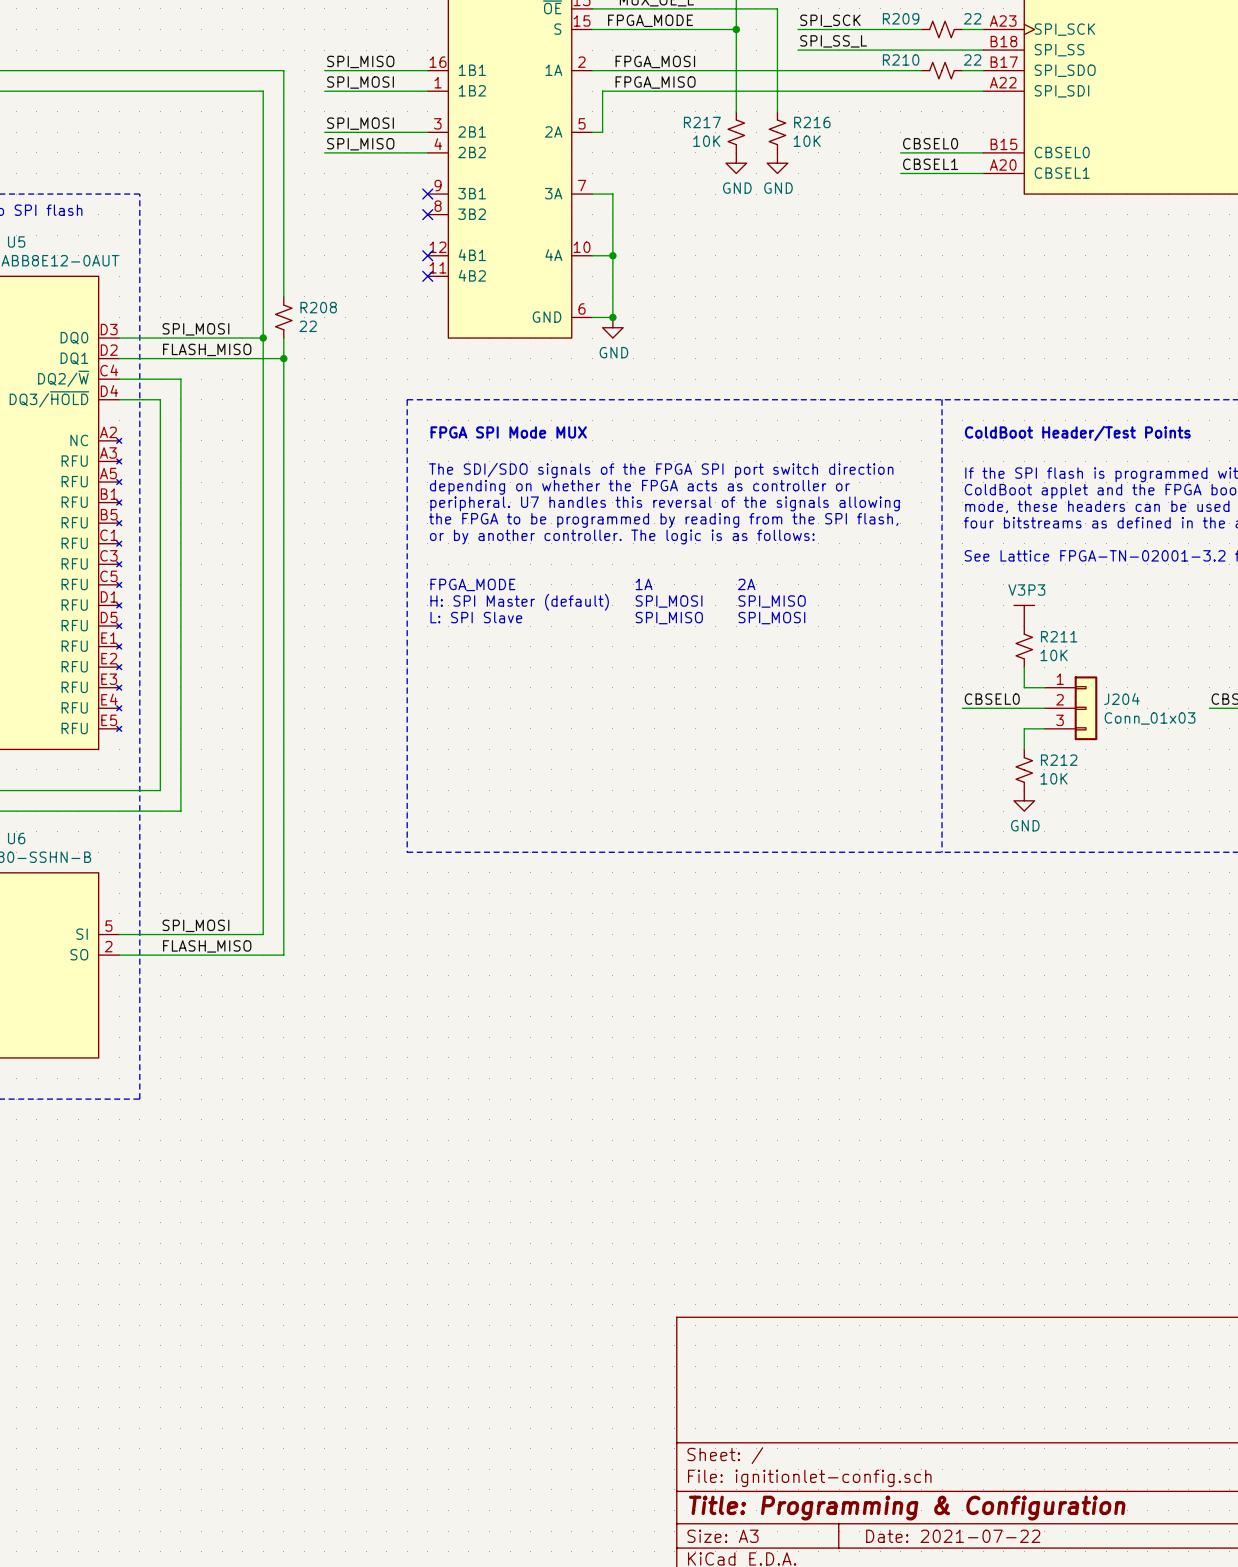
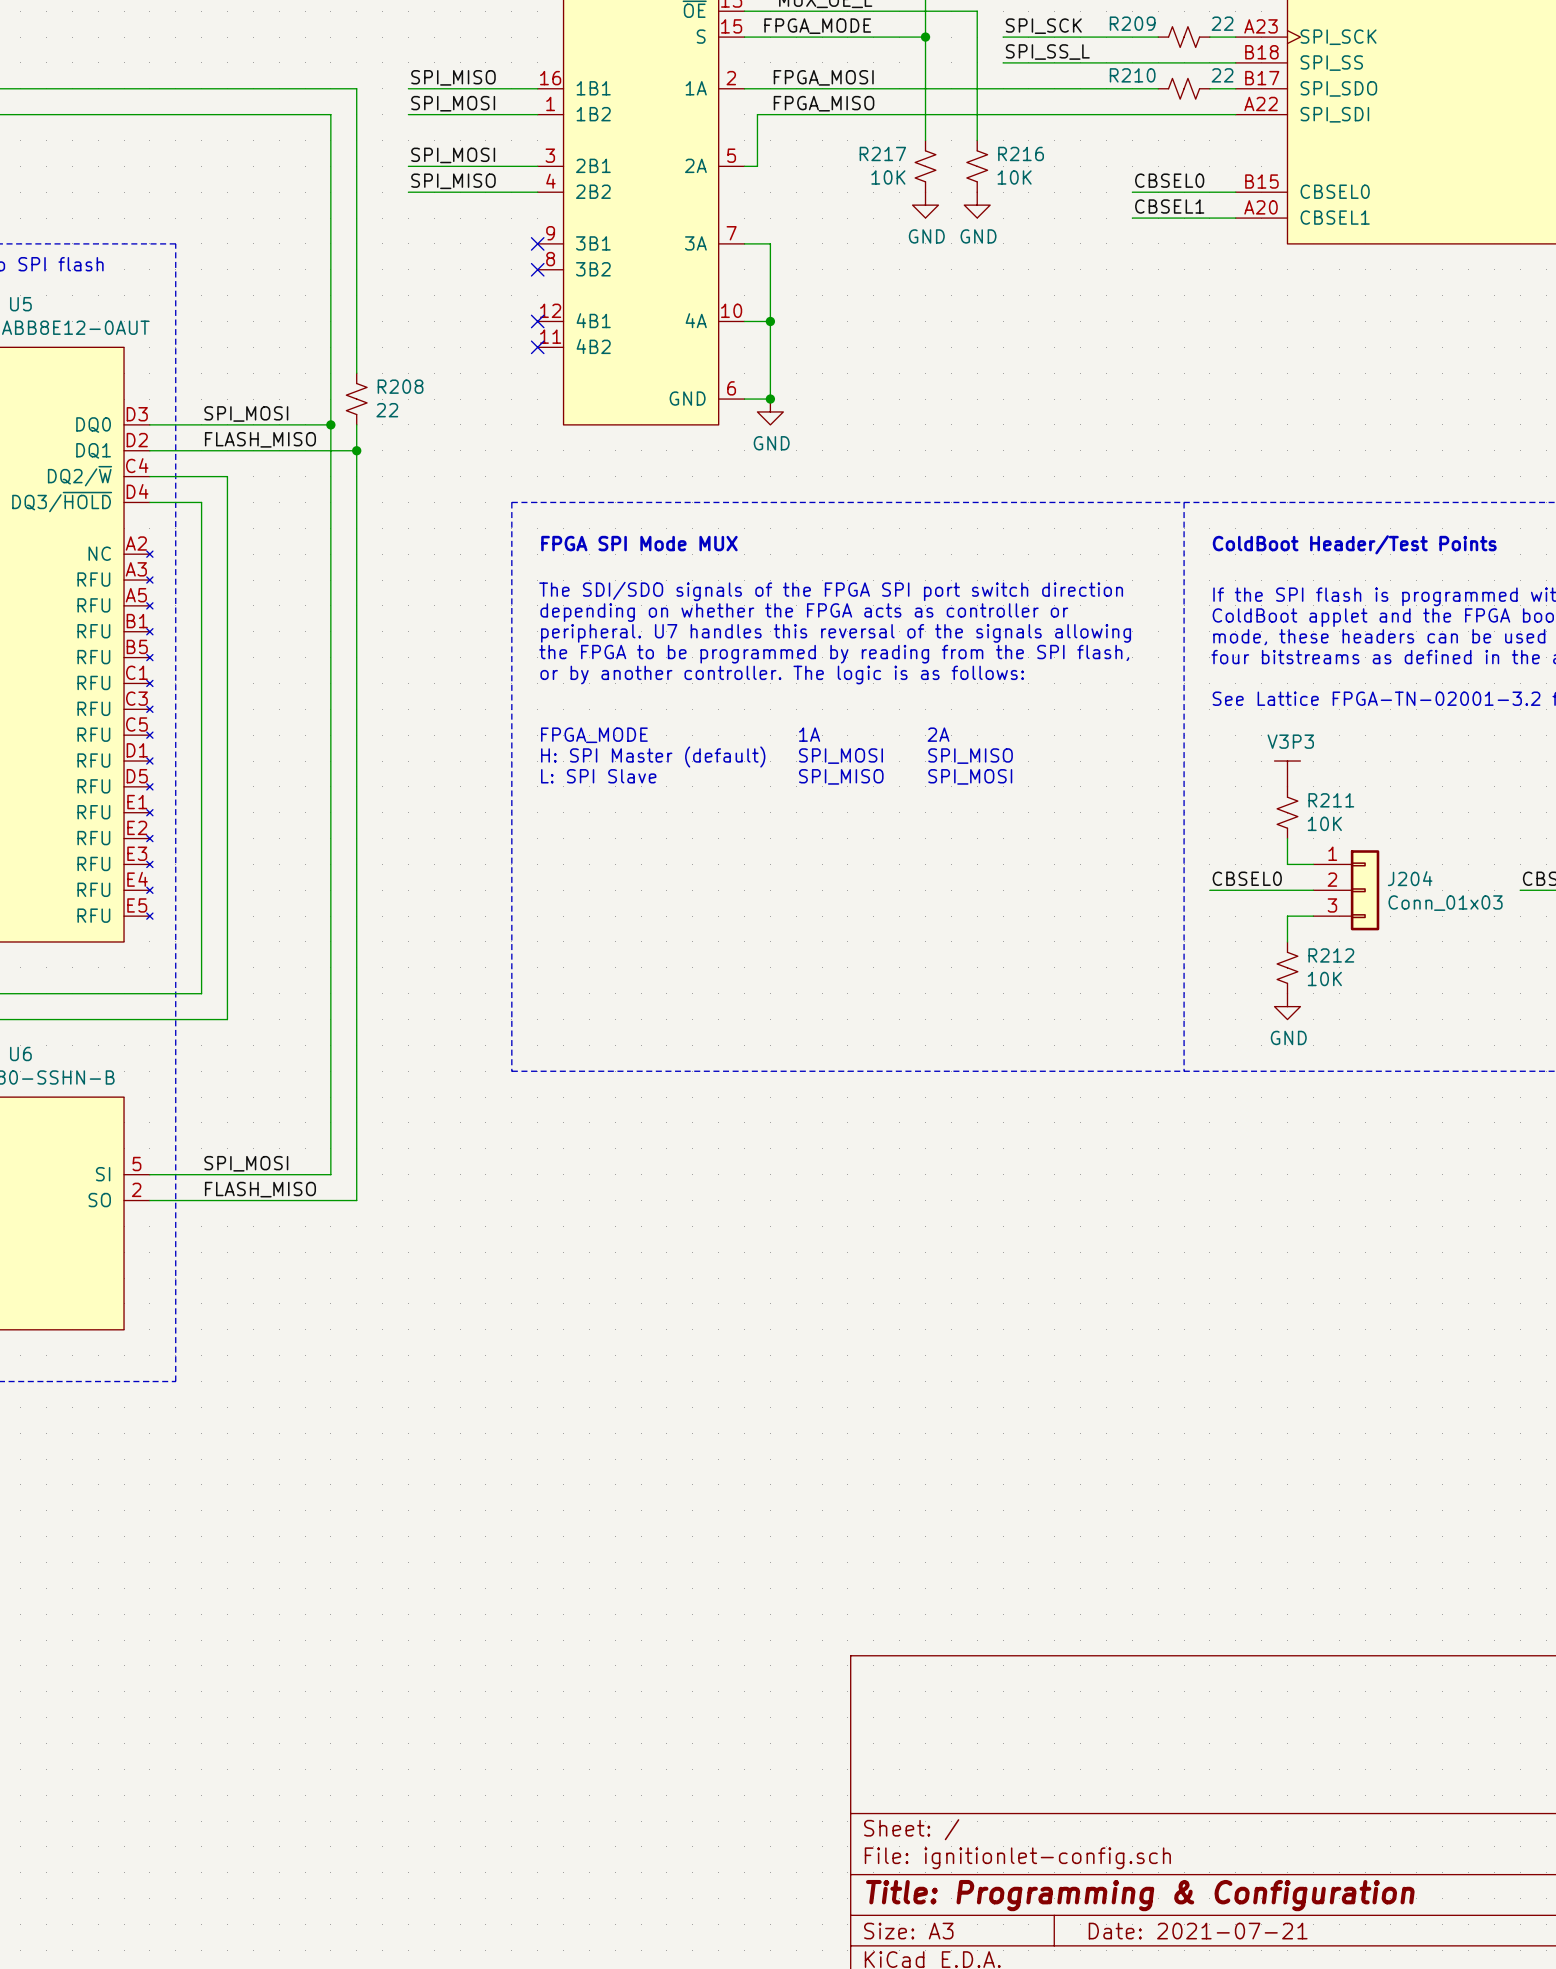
title block: Date: 2021-07-22 (953, 1536) -> Date: 2021-07-21 (1198, 1931)

